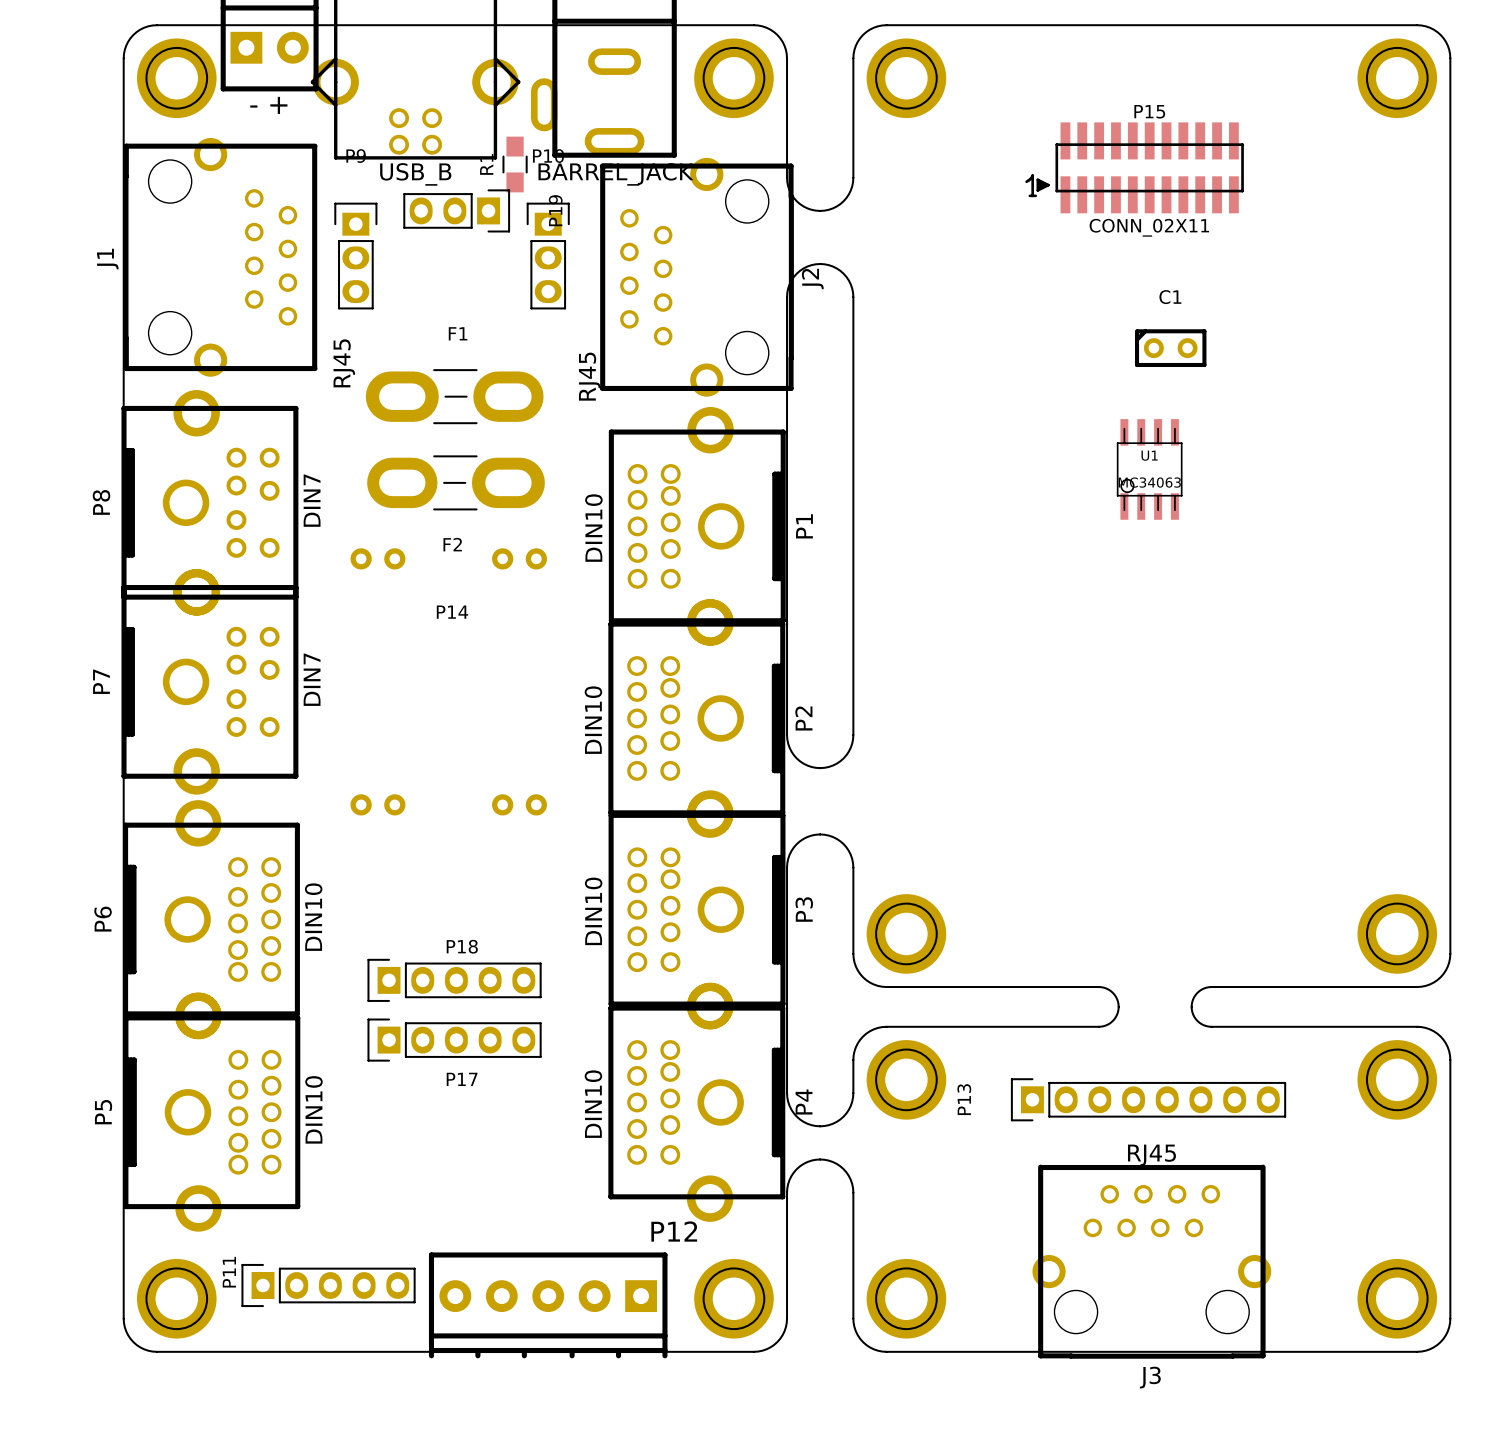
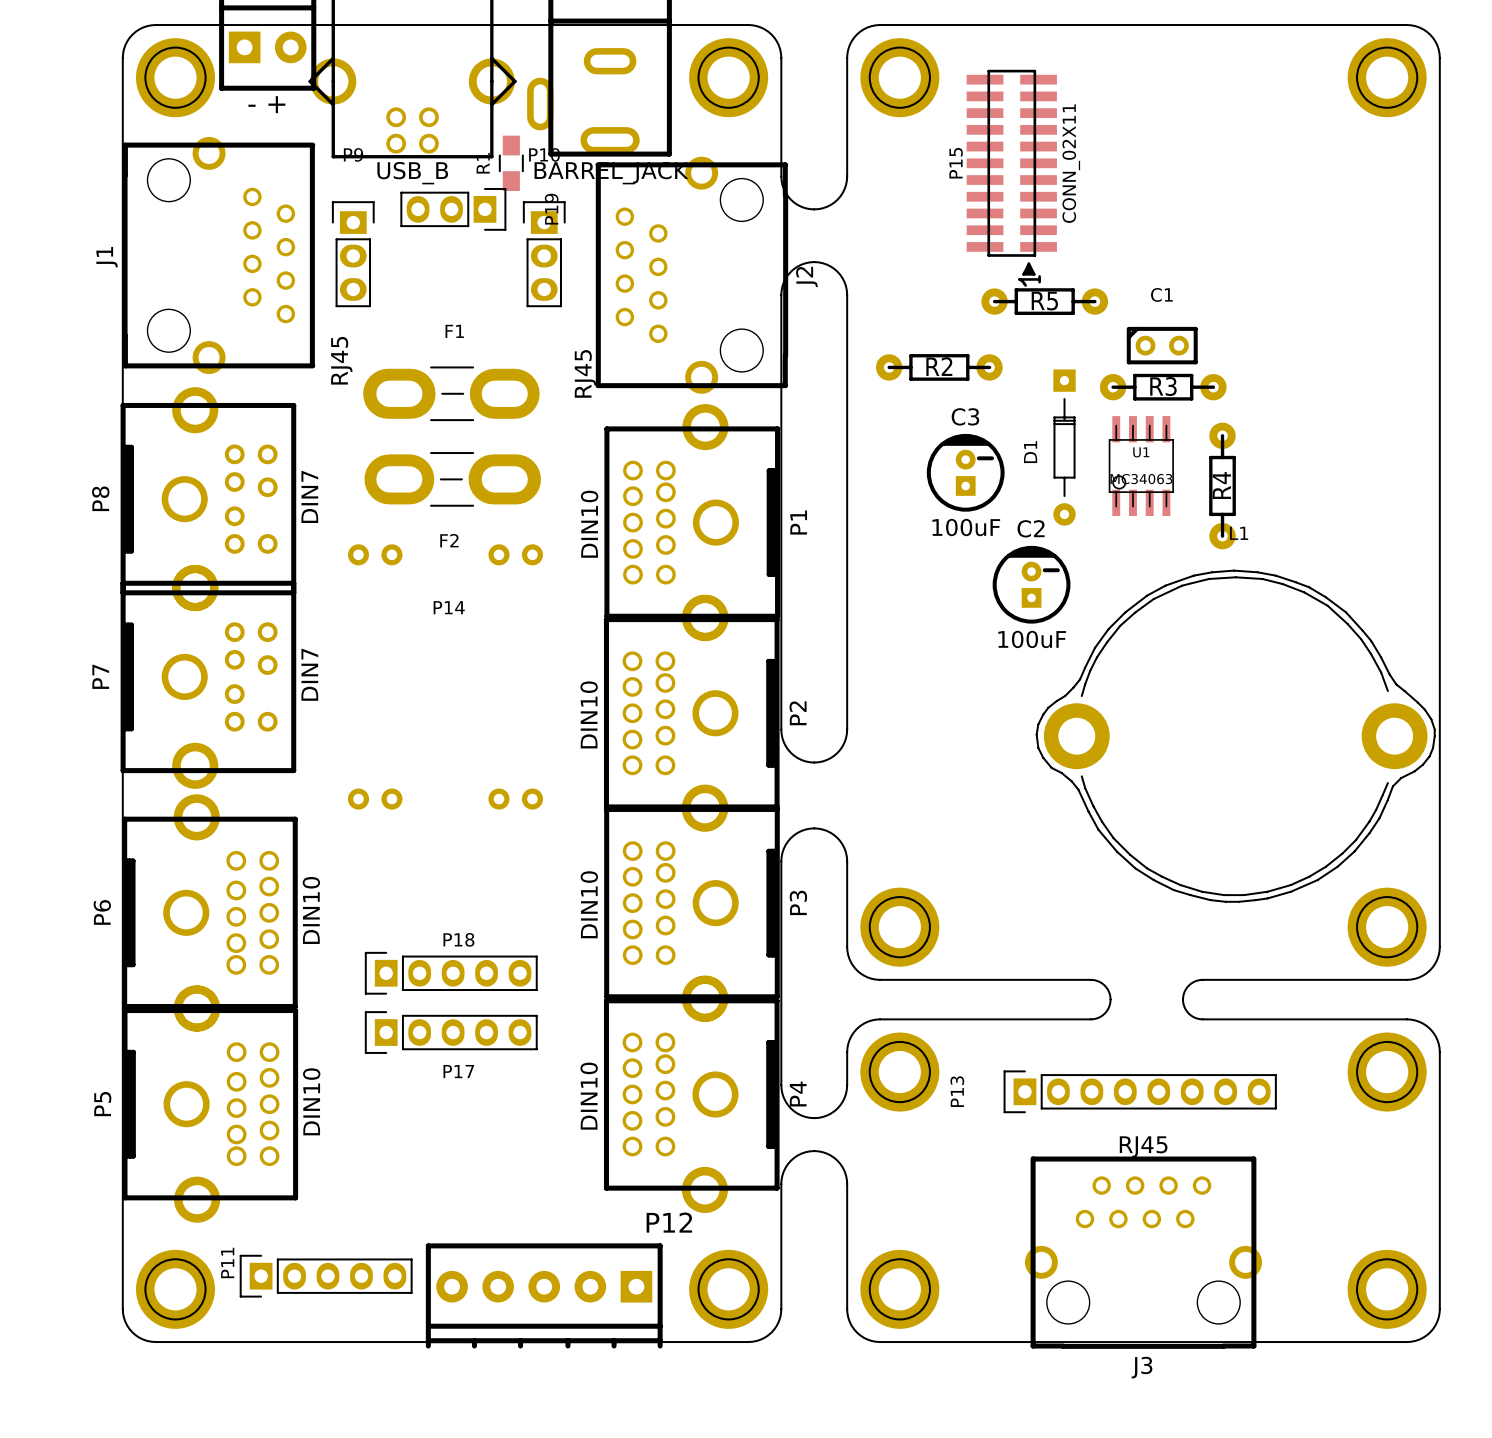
P15 rotation: 0° (1134, 167) -> 90° counterclockwise (1011, 178)
R5: none -> (1044, 301)
R2: none -> (939, 367)
R3: none -> (1163, 387)
D1: none -> (1064, 447)
C3: none -> 100uF (965, 472)
R4: none -> (1222, 485)
C2: none -> 100uF (1031, 584)
L1: none -> (1235, 736)

